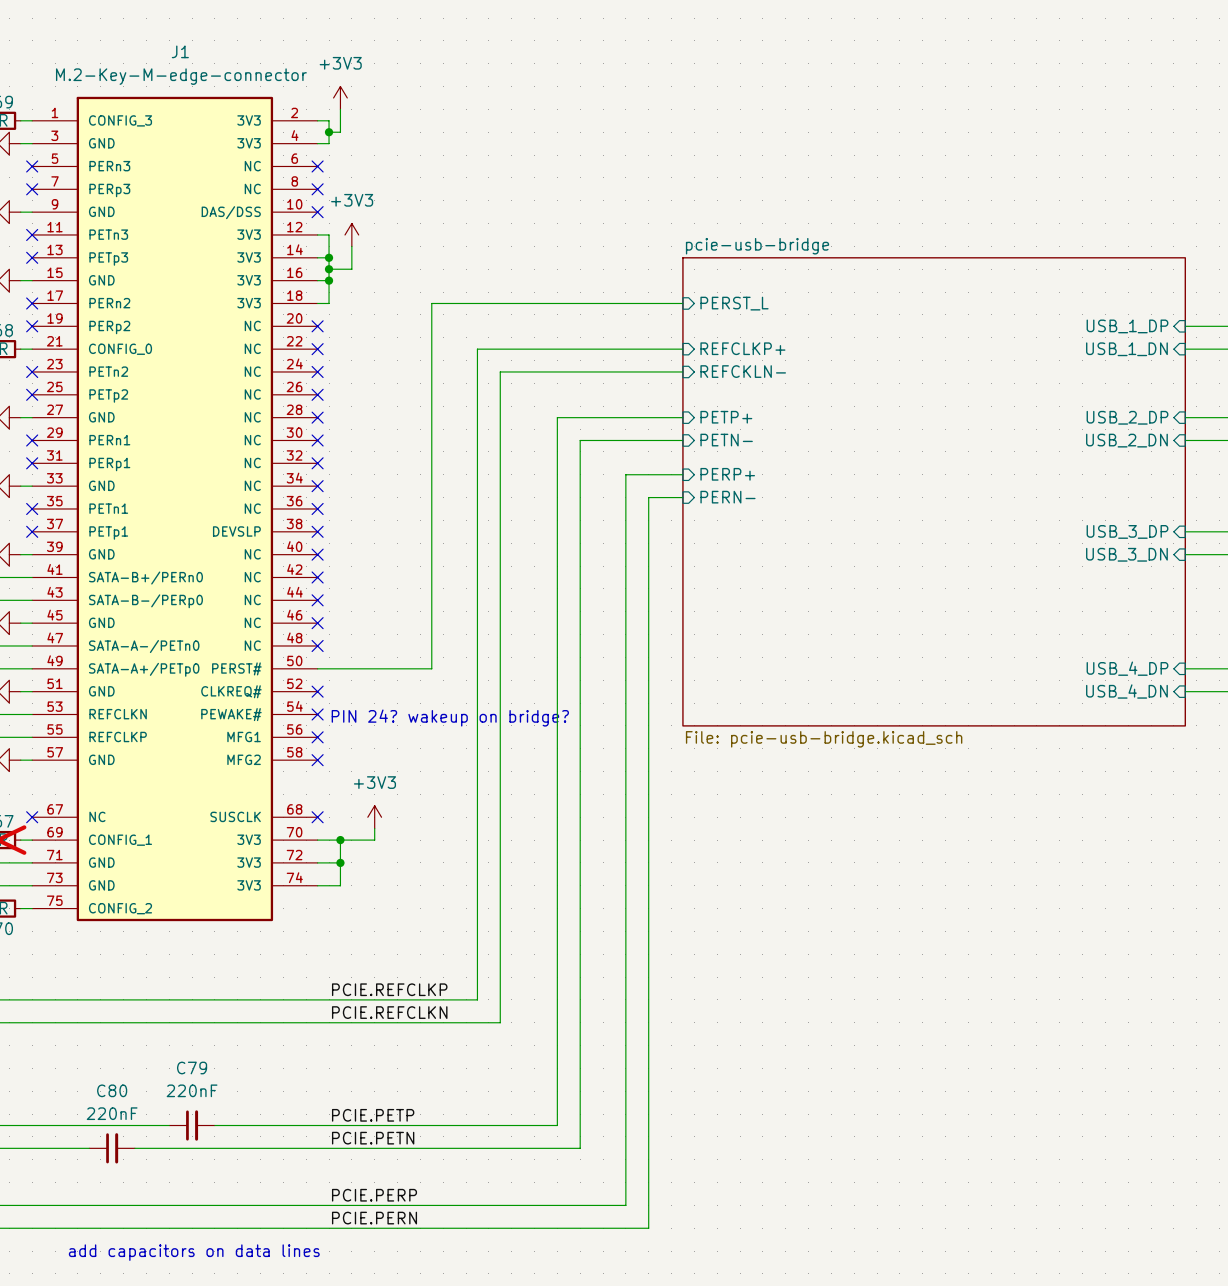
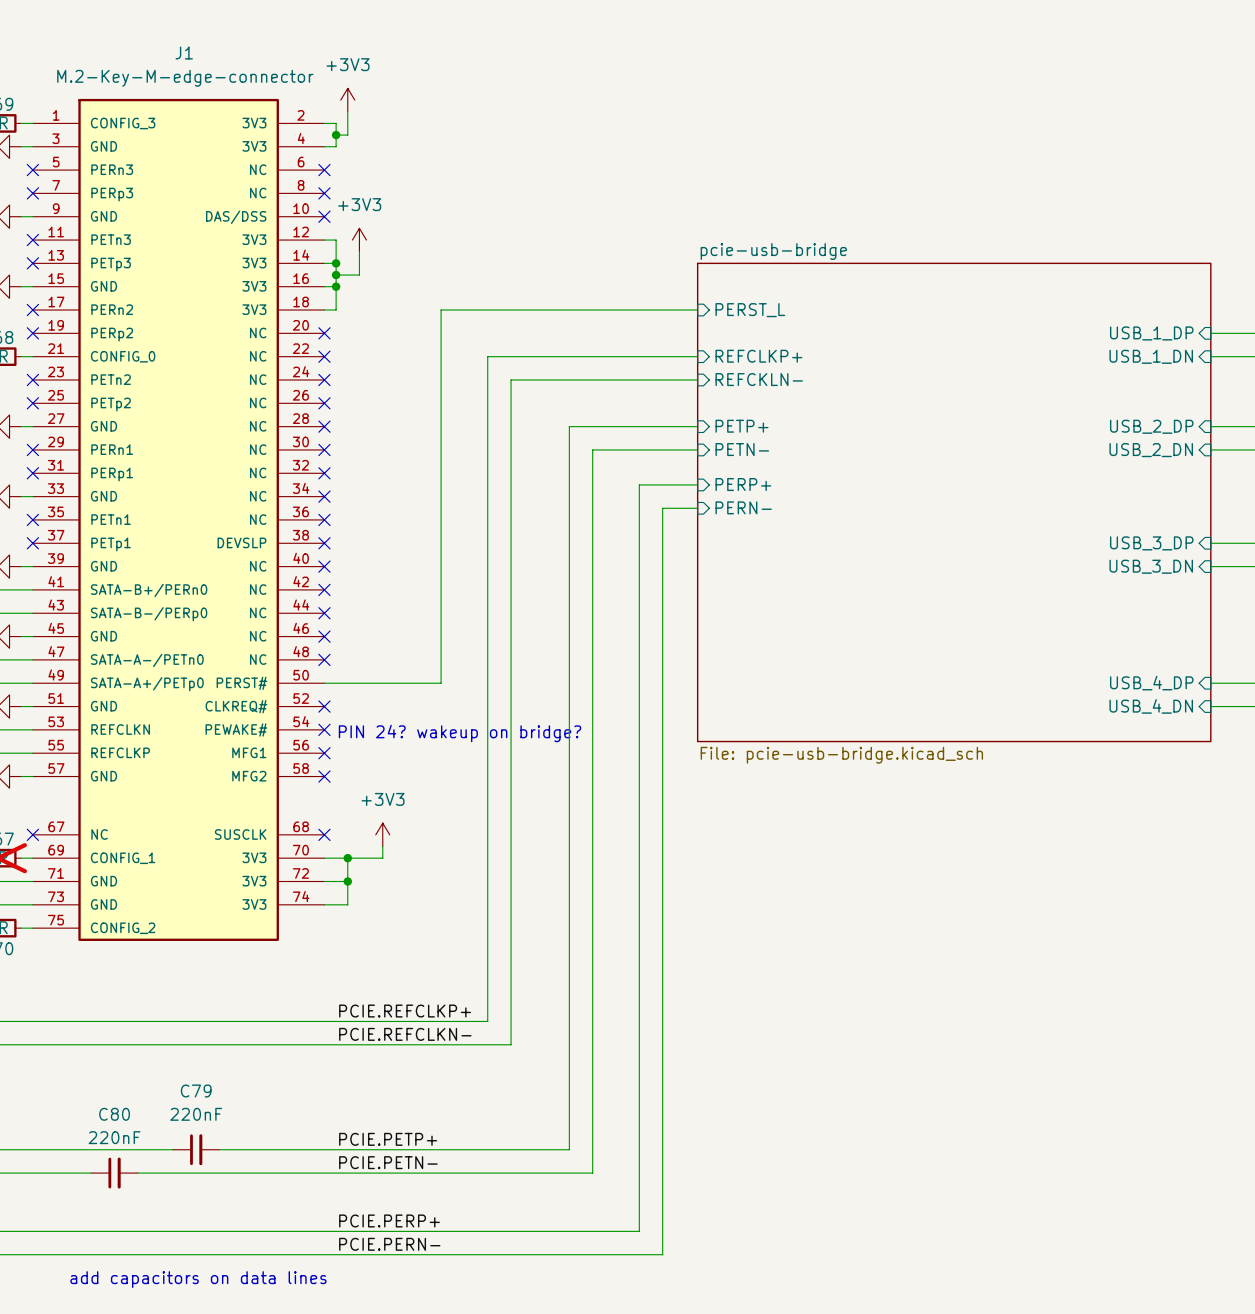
label: PCIE.REFCLKP (389, 989) -> PCIE.REFCLKP+ (405, 1011)
label: PCIE.REFCLKN (389, 1012) -> PCIE.REFCLKN- (405, 1034)
label: PCIE.PETP (373, 1115) -> PCIE.PETP+ (388, 1139)
label: PCIE.PETN (373, 1138) -> PCIE.PETN- (388, 1162)
label: PCIE.PERP (374, 1195) -> PCIE.PERP+ (389, 1220)
label: PCIE.PERN (374, 1218) -> PCIE.PERN- (389, 1244)

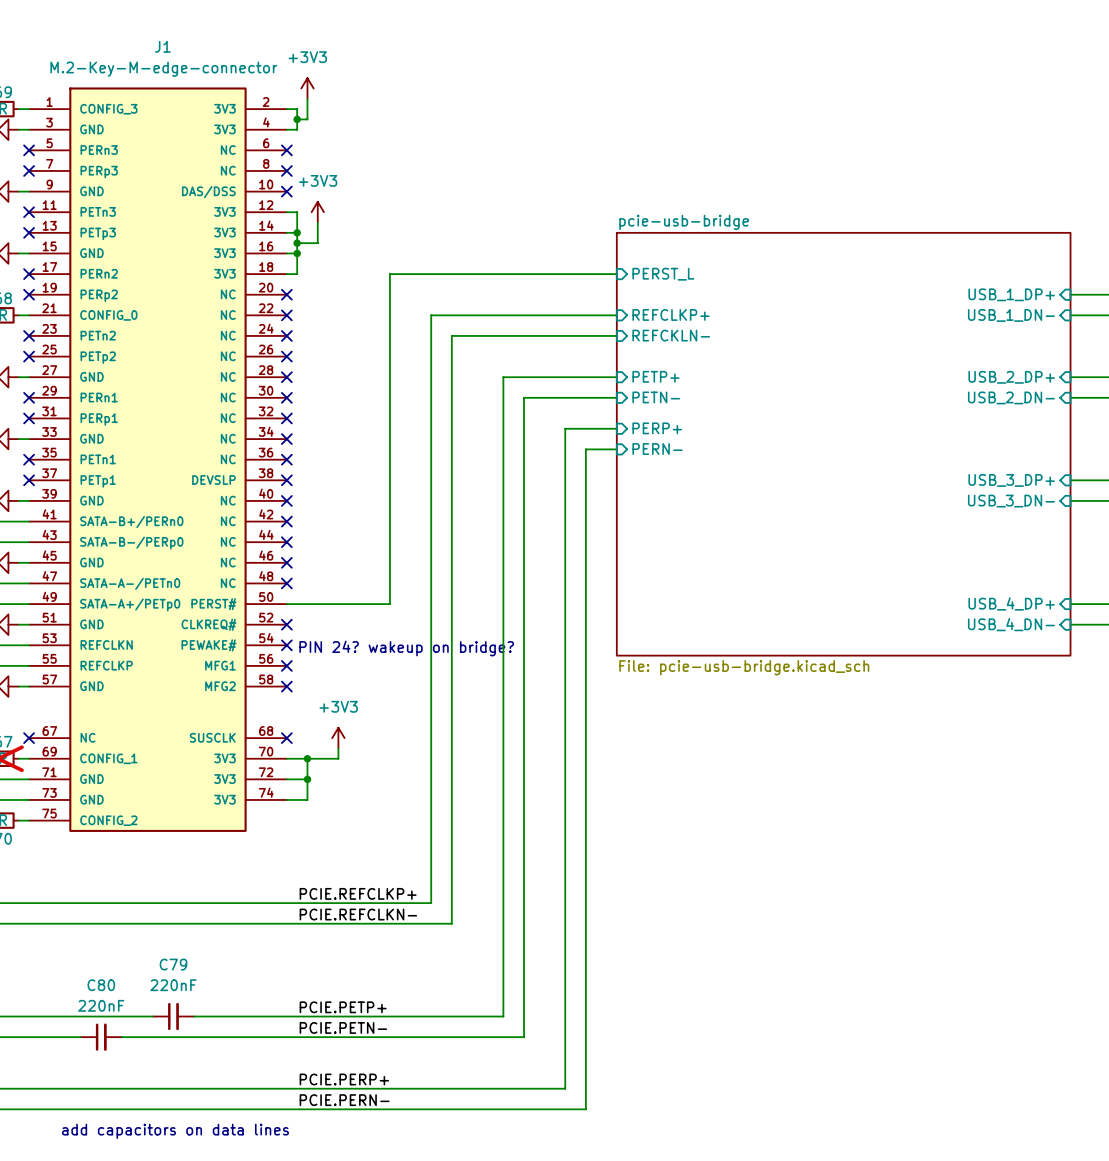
sheet pin: USB_1_DP (1151, 333) -> USB_1_DP+ (1011, 294)
sheet pin: USB_1_DN (1151, 356) -> USB_1_DN- (1011, 315)
sheet pin: USB_2_DP (1151, 426) -> USB_2_DP+ (1011, 377)
sheet pin: USB_2_DN (1151, 450) -> USB_2_DN- (1011, 397)
sheet pin: USB_3_DP (1151, 543) -> USB_3_DP+ (1011, 480)
sheet pin: USB_3_DN (1151, 566) -> USB_3_DN- (1011, 501)
sheet pin: USB_4_DP (1151, 683) -> USB_4_DP+ (1011, 603)
sheet pin: USB_4_DN (1151, 706) -> USB_4_DN- (1011, 624)

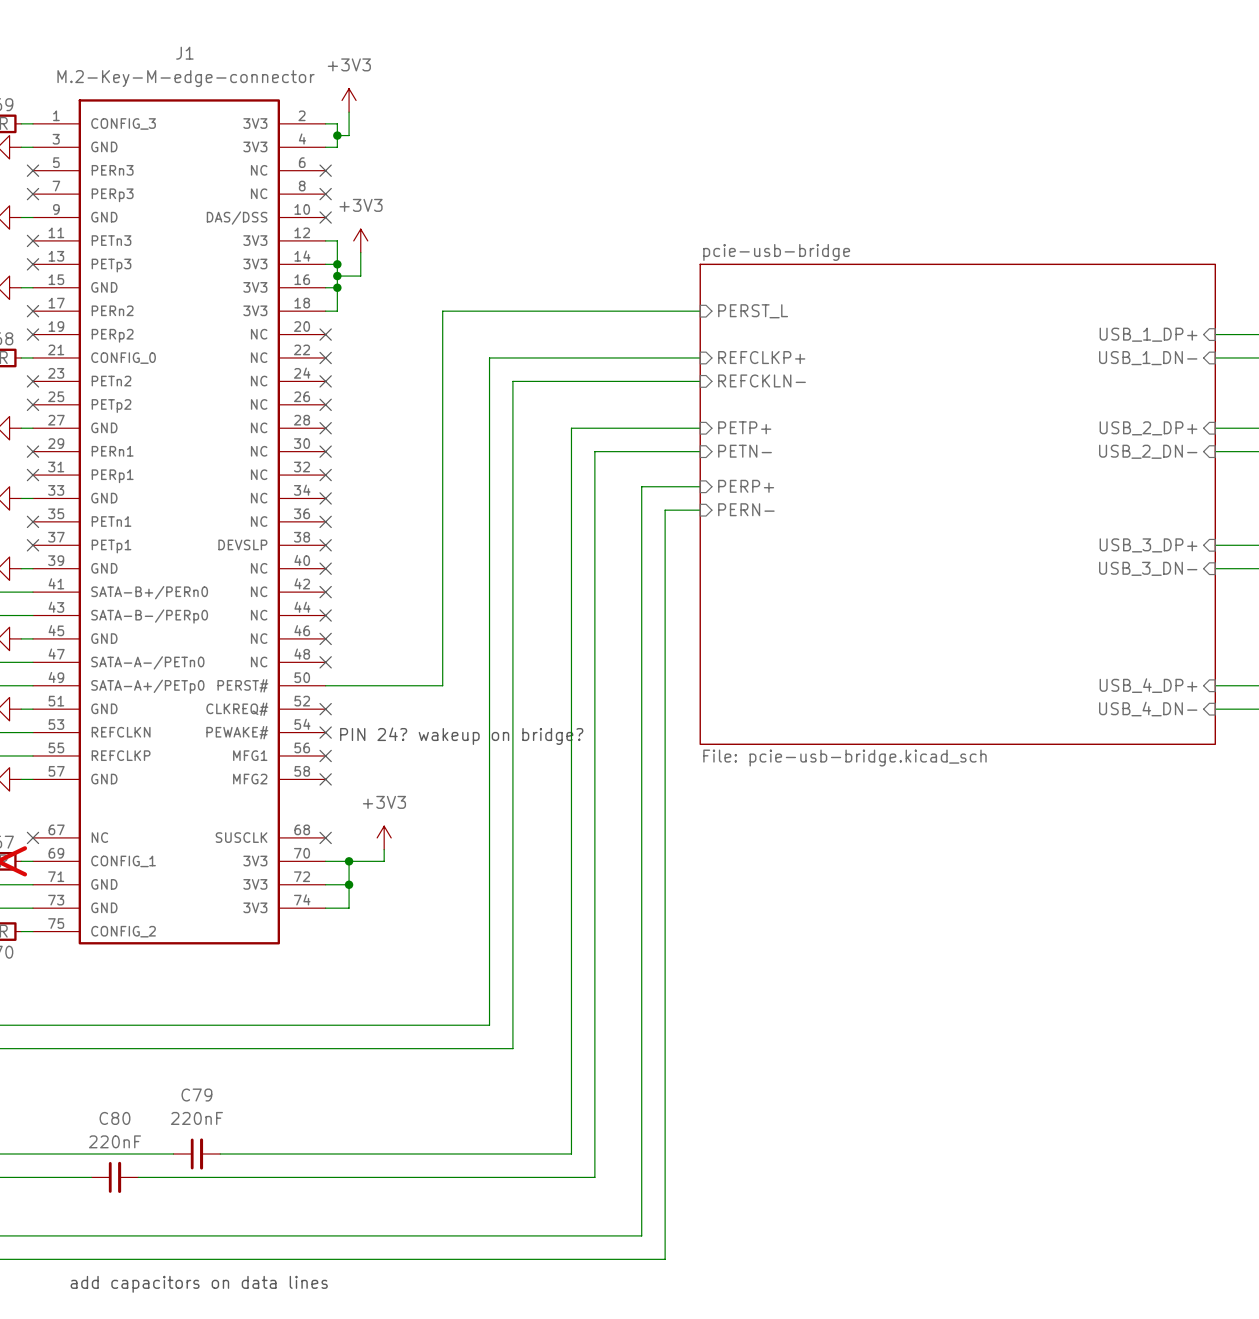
label: PCIE.REFCLKP+ (358, 893) -> none
label: PCIE.REFCLKN- (358, 914) -> none
label: PCIE.PETP+ (343, 1007) -> none
label: PCIE.PETN- (343, 1027) -> none
label: PCIE.PERP+ (344, 1079) -> none
label: PCIE.PERN- (344, 1100) -> none

